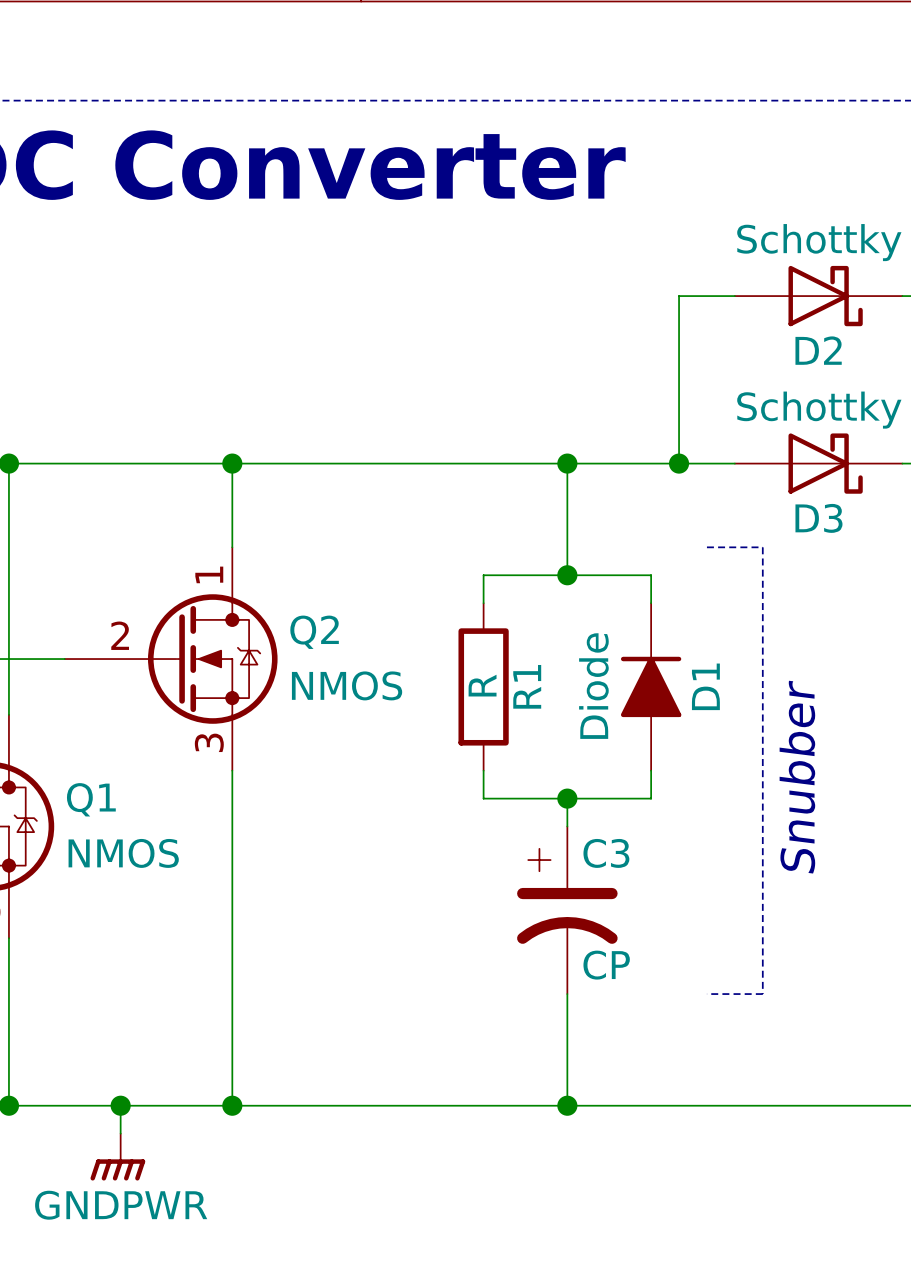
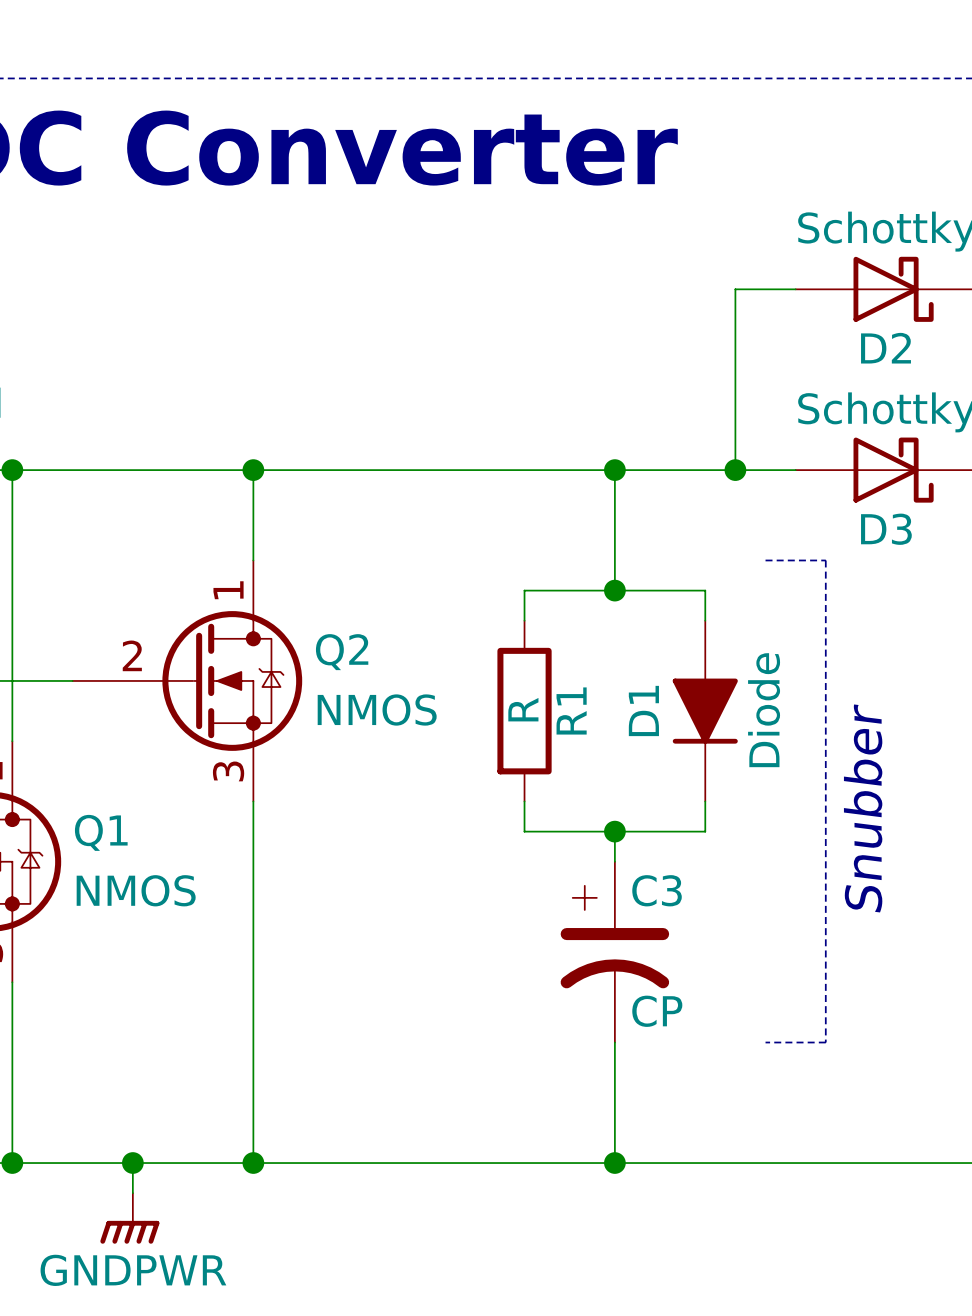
D1 rotation: 0° (651, 686) -> 180° (705, 711)

